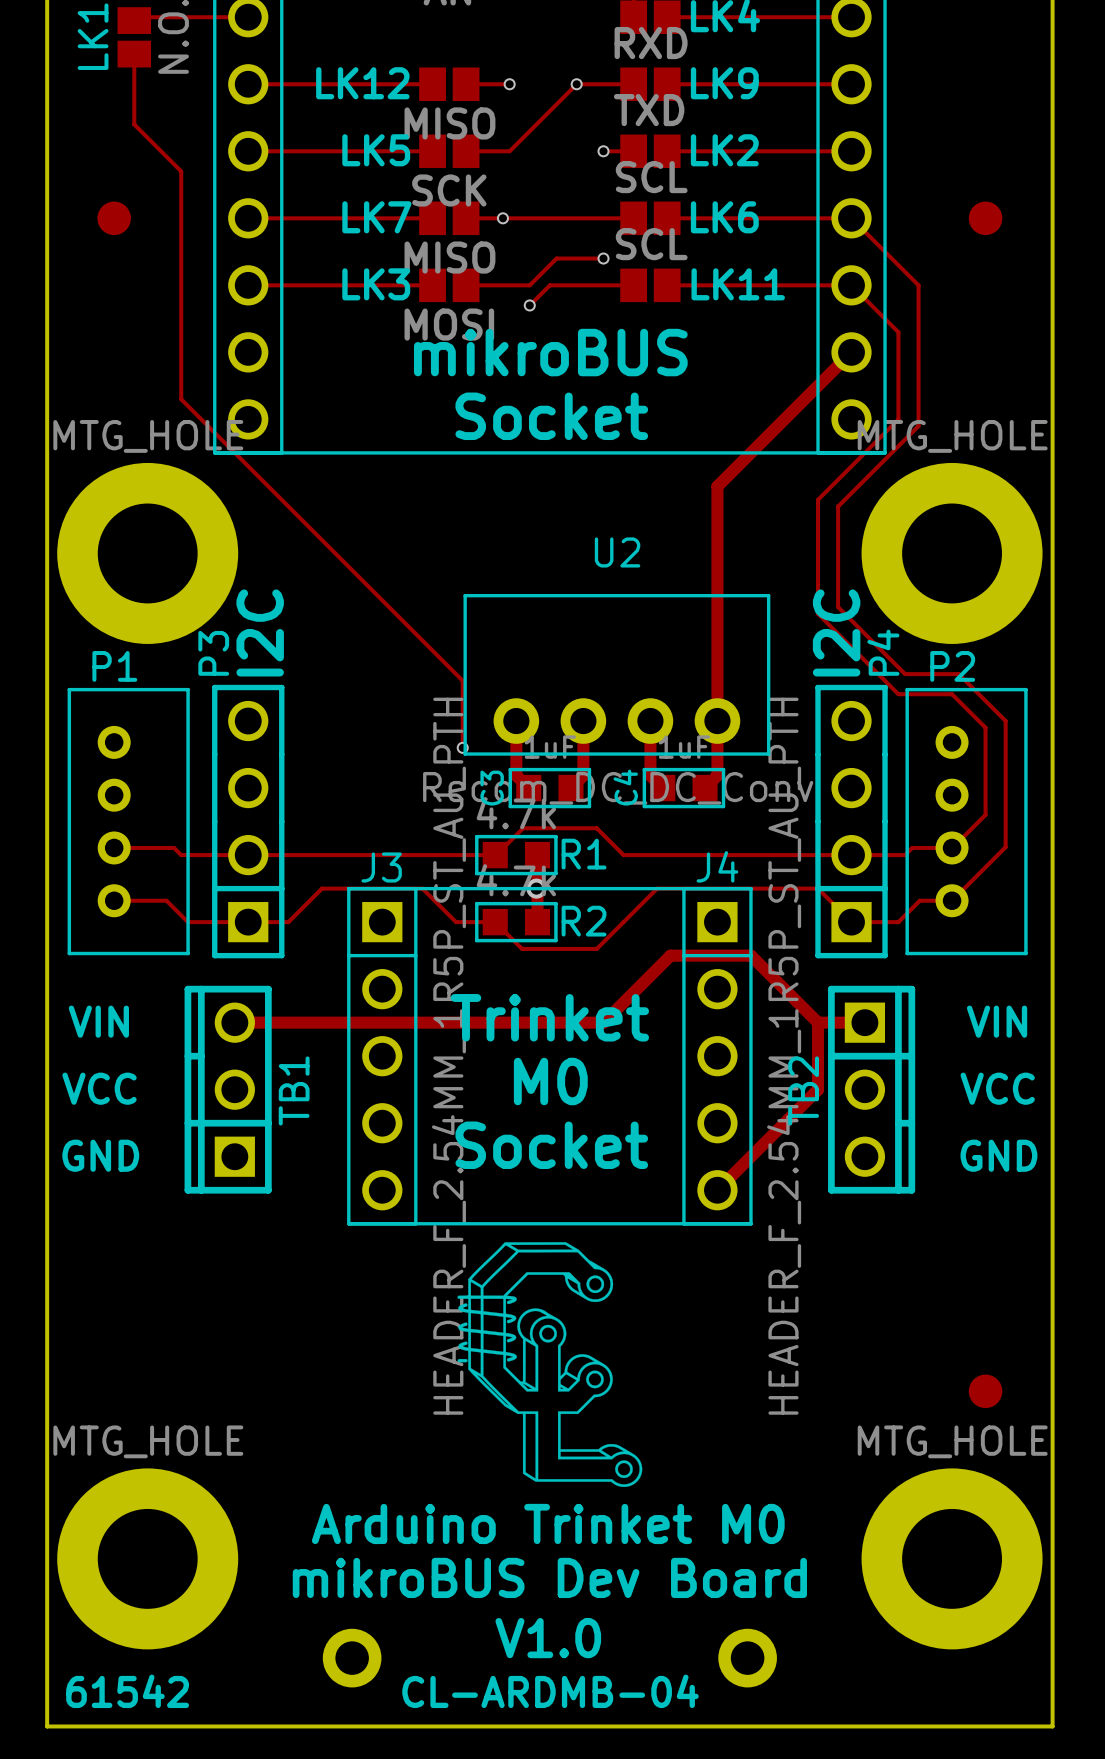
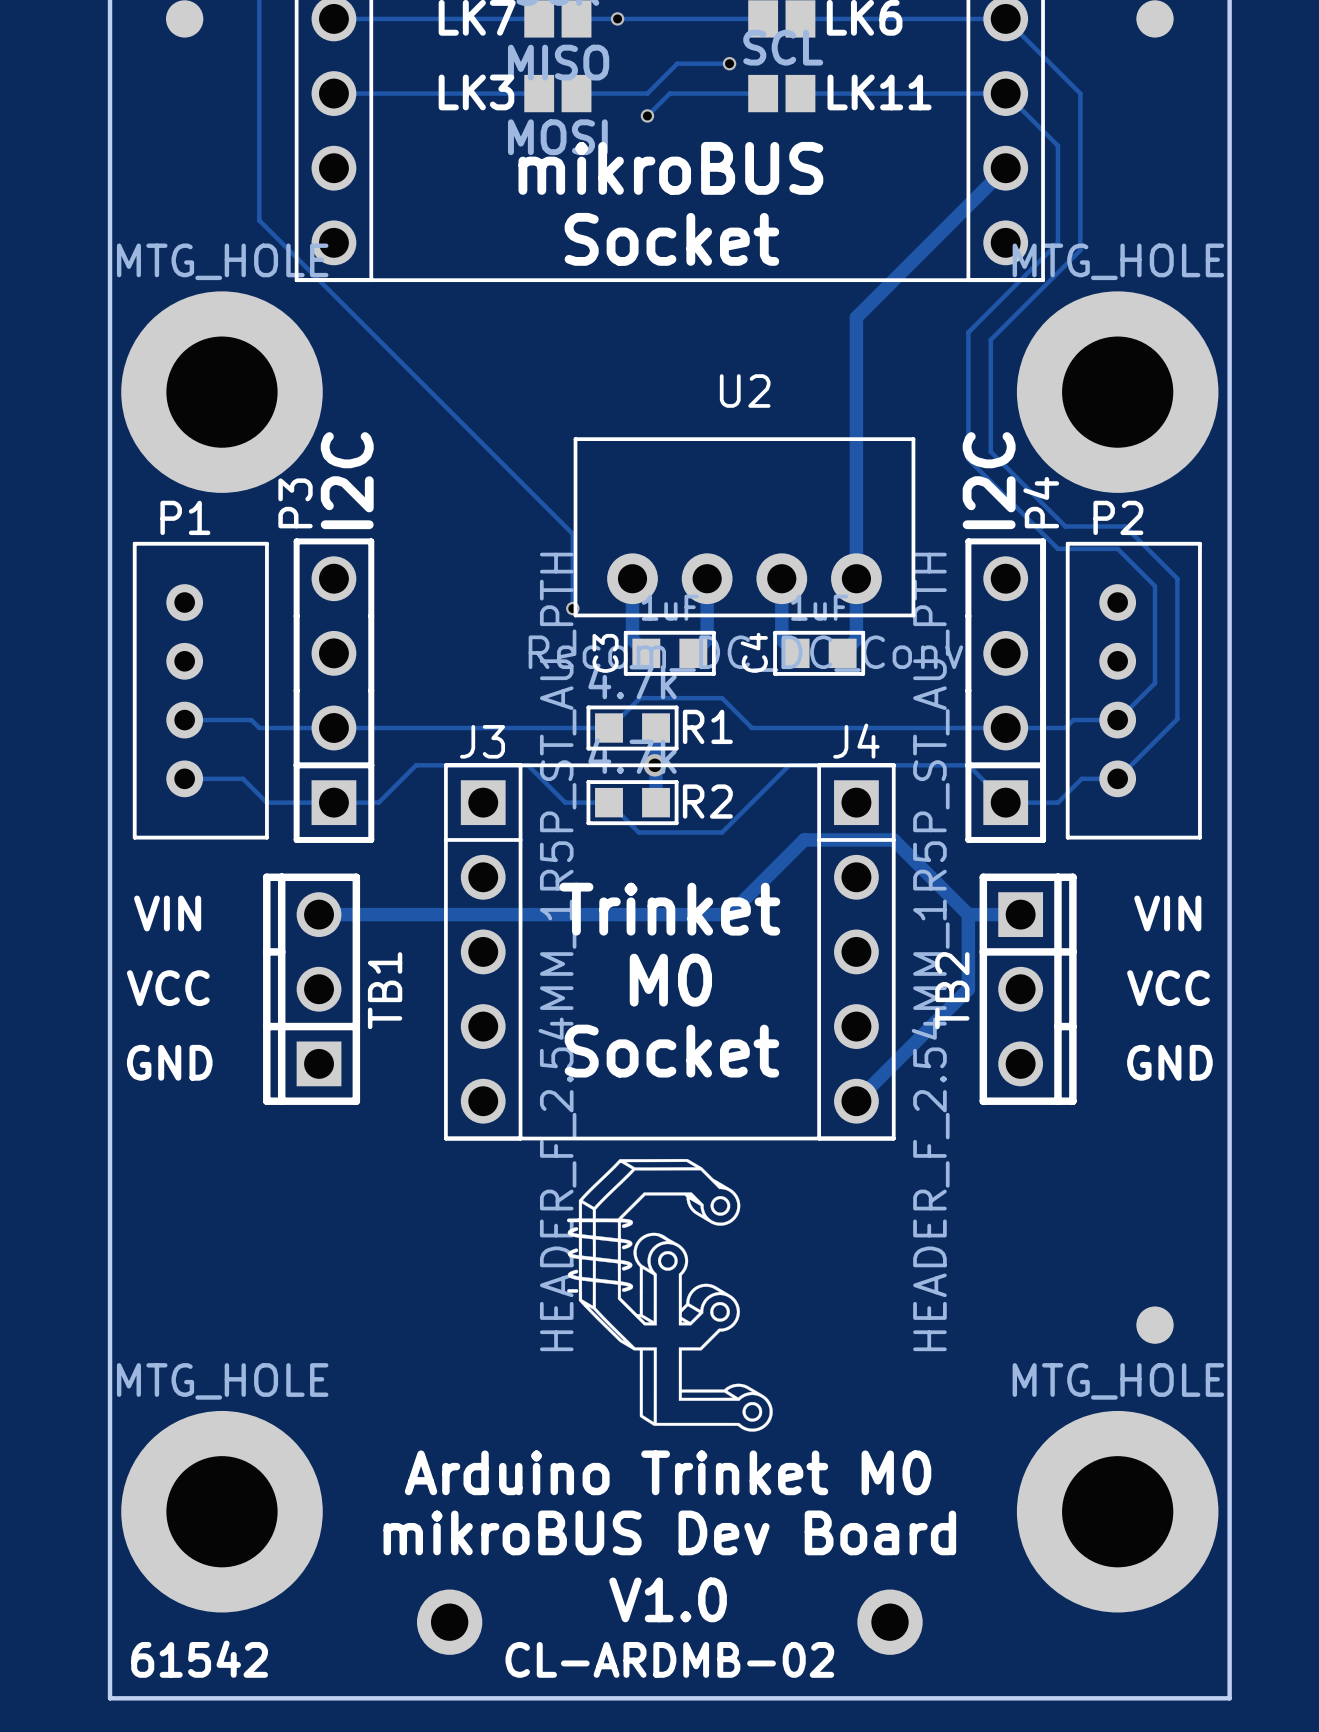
text: CL-ARDMB-04 (550, 1691) -> CL-ARDMB-02 (669, 1659)

